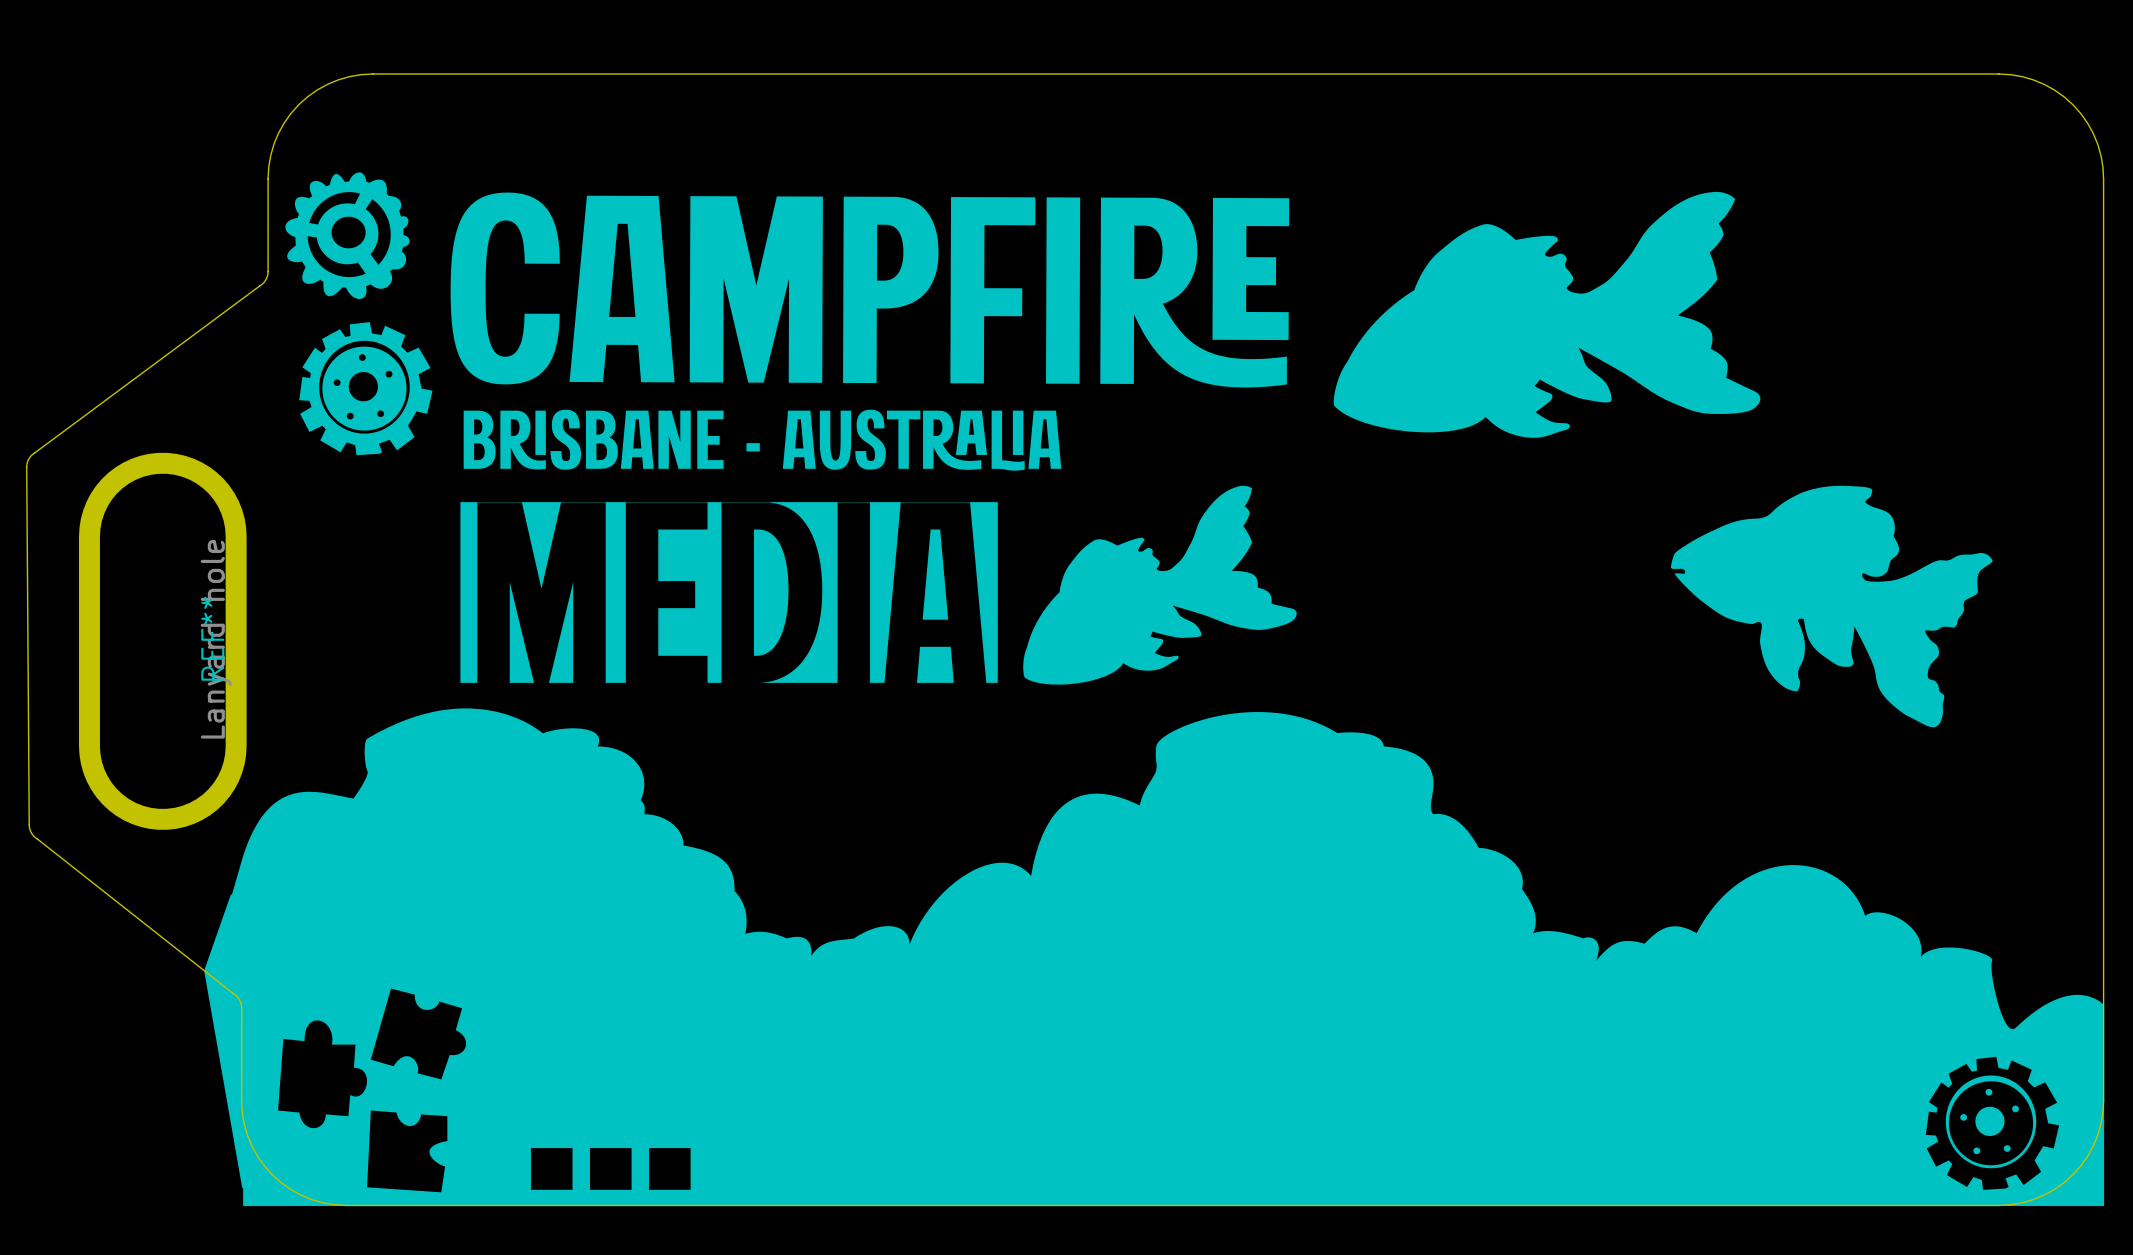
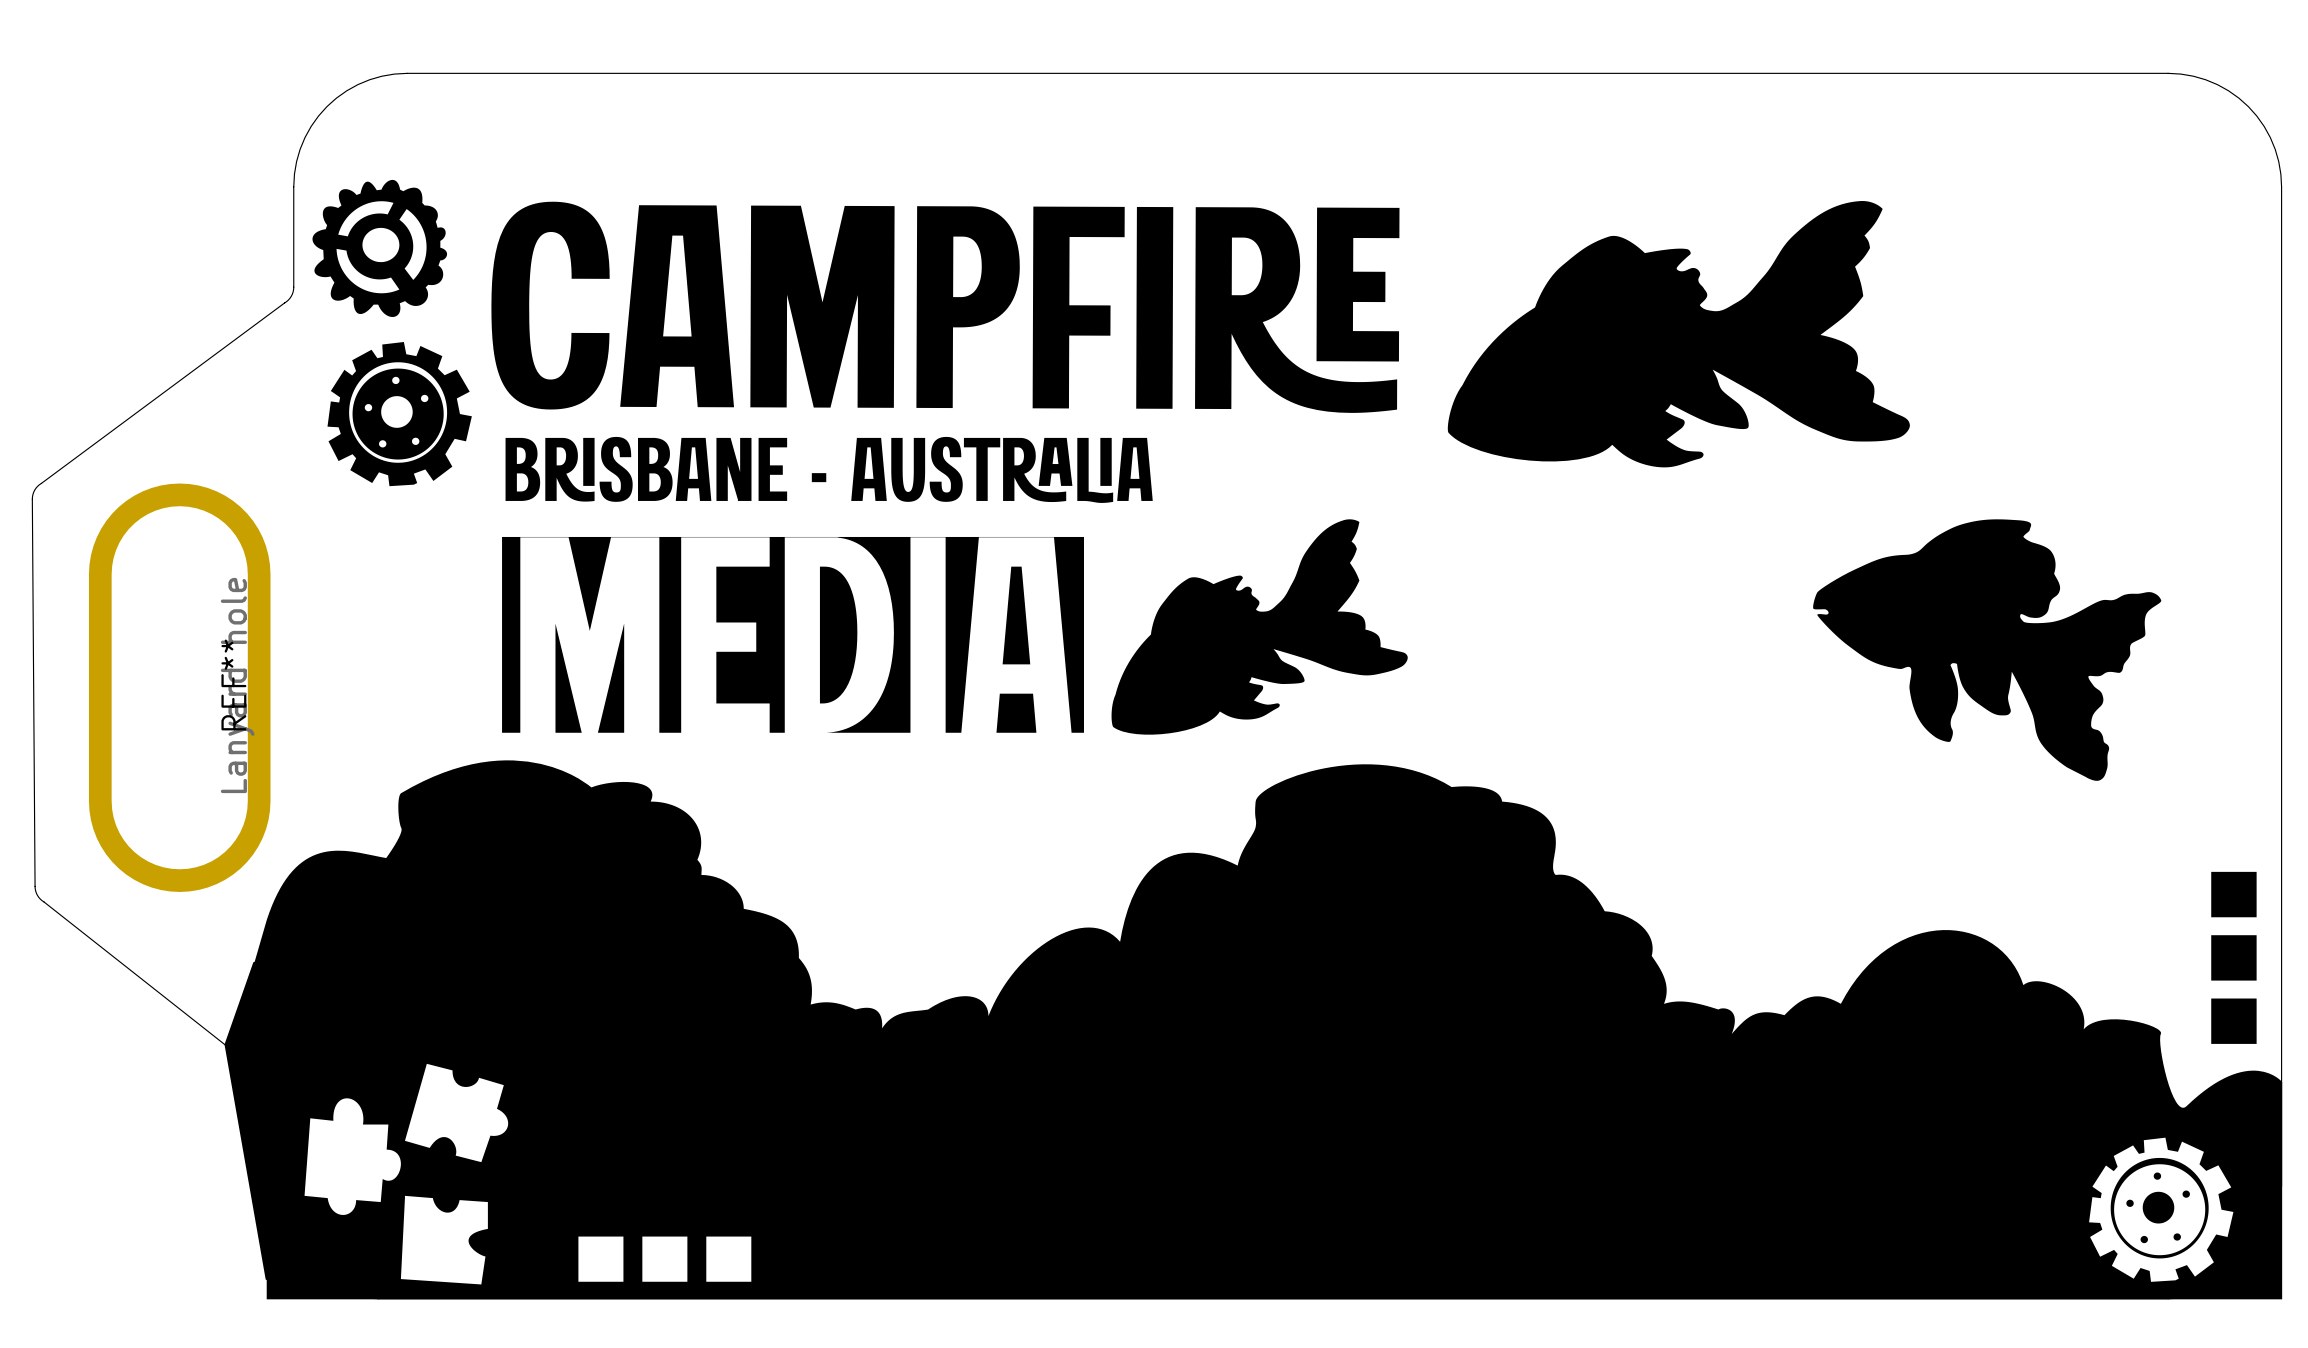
drawing: none -> [2211, 871, 2257, 1044]

